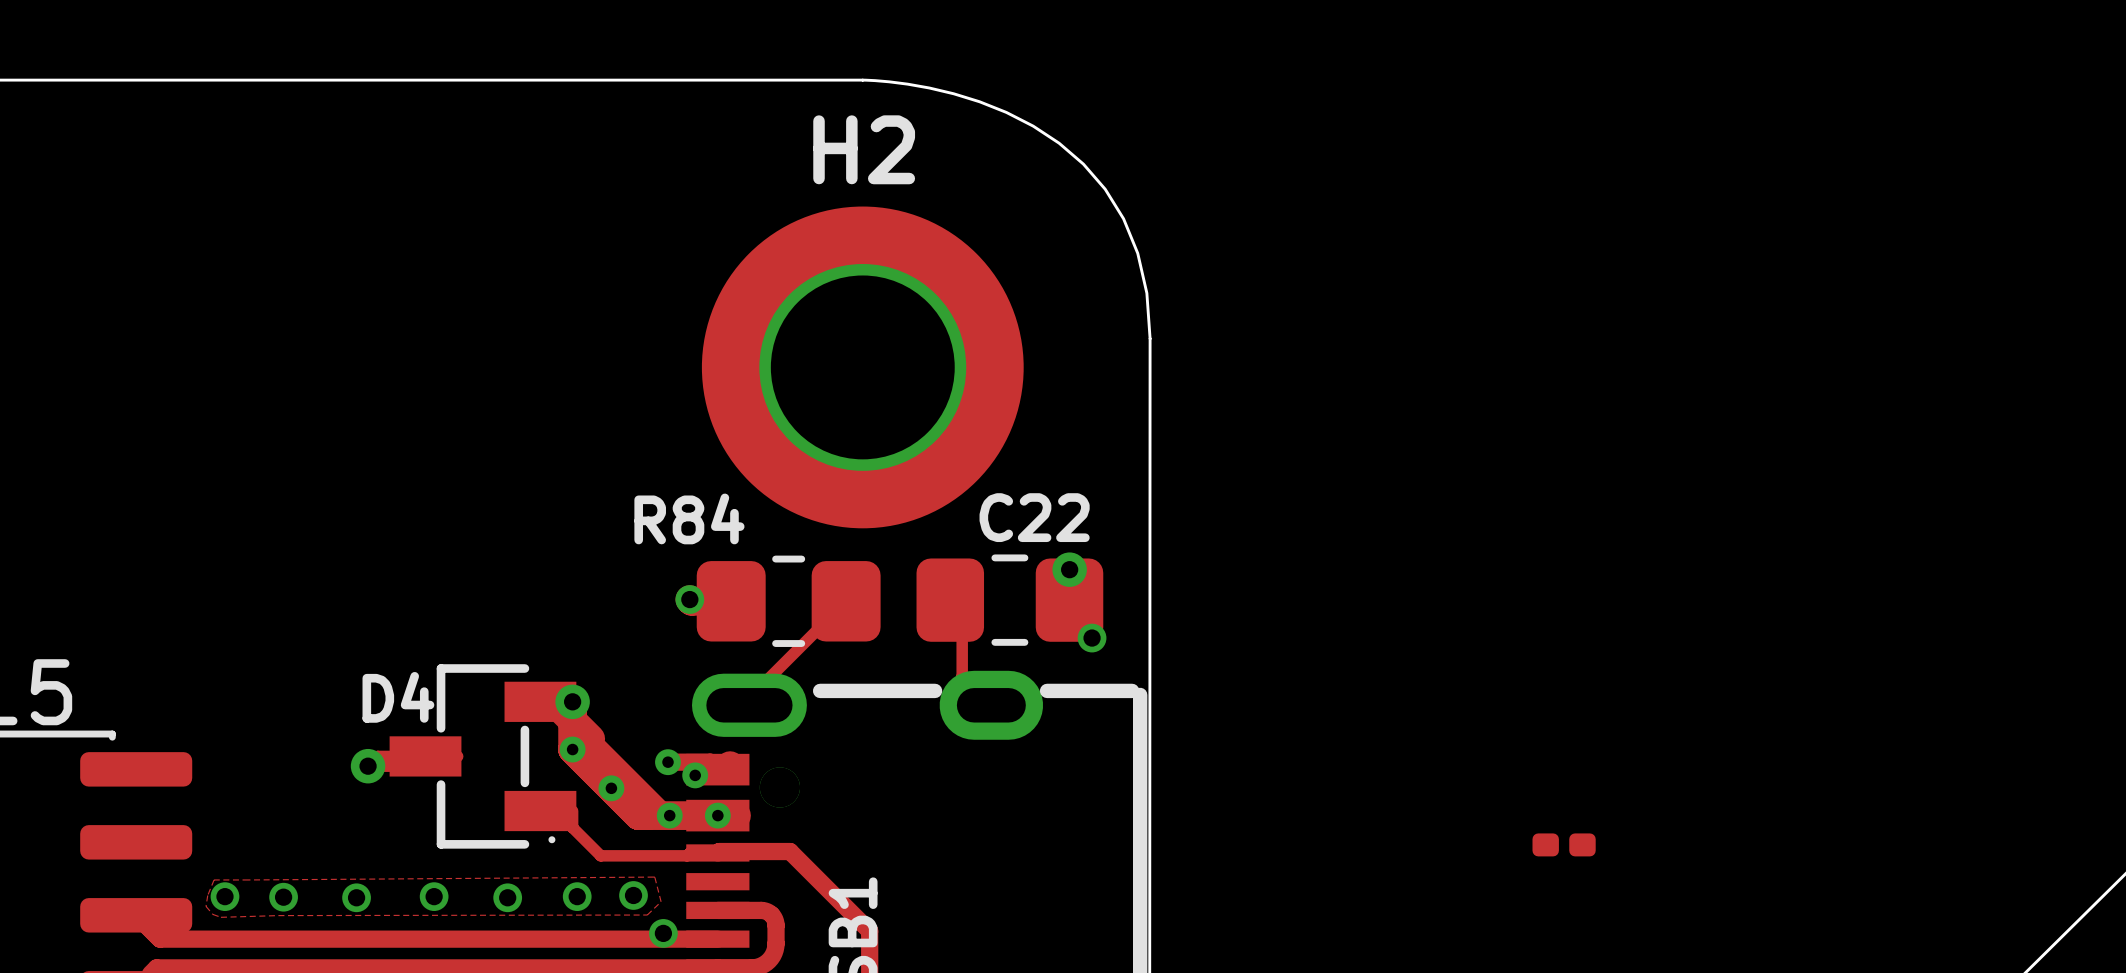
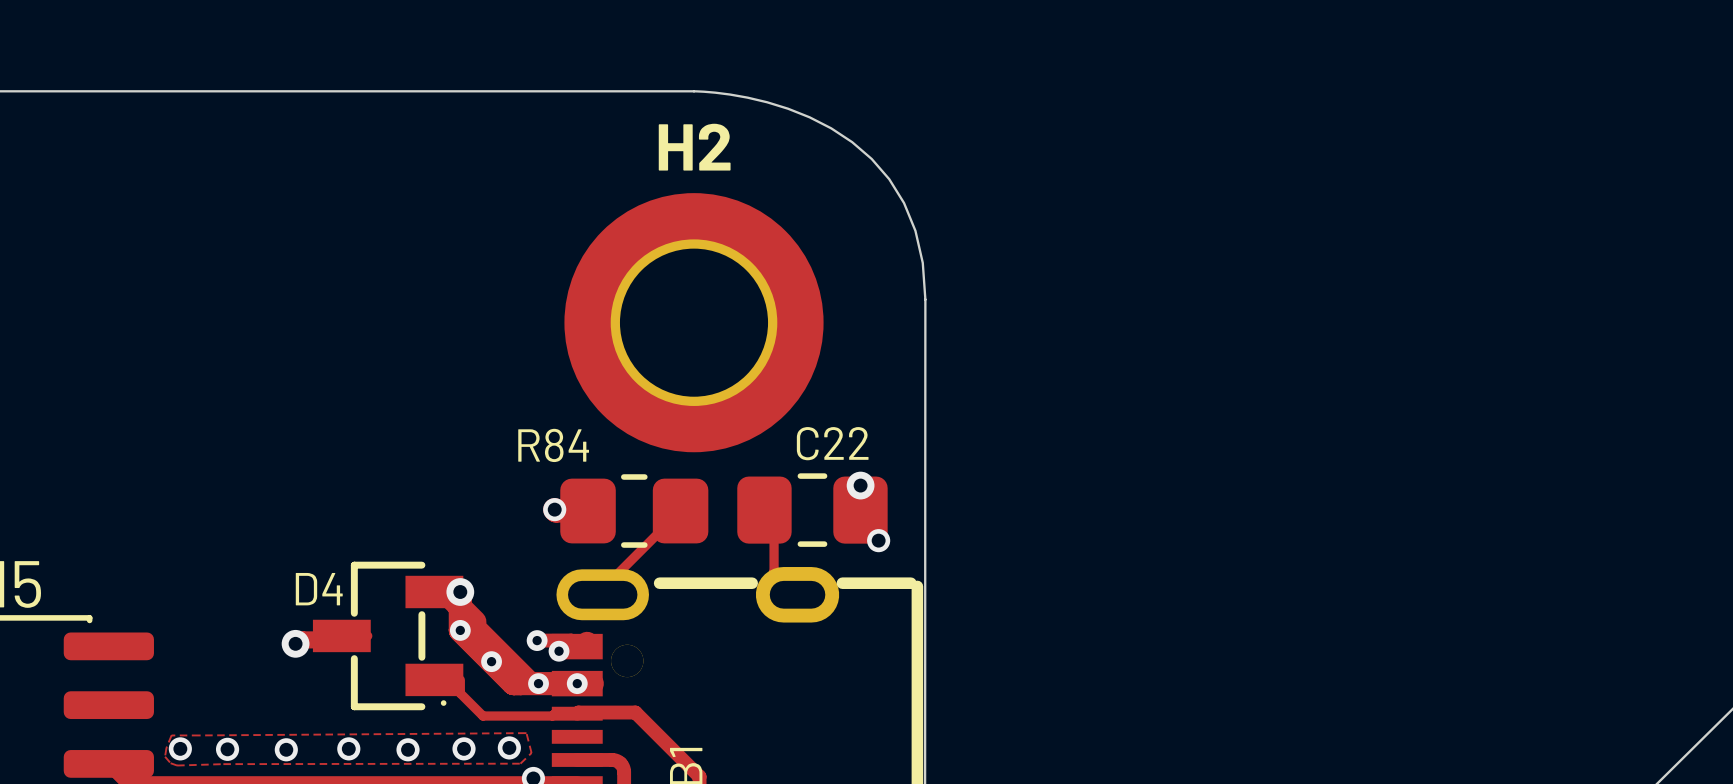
part: (1564, 844) -> none

